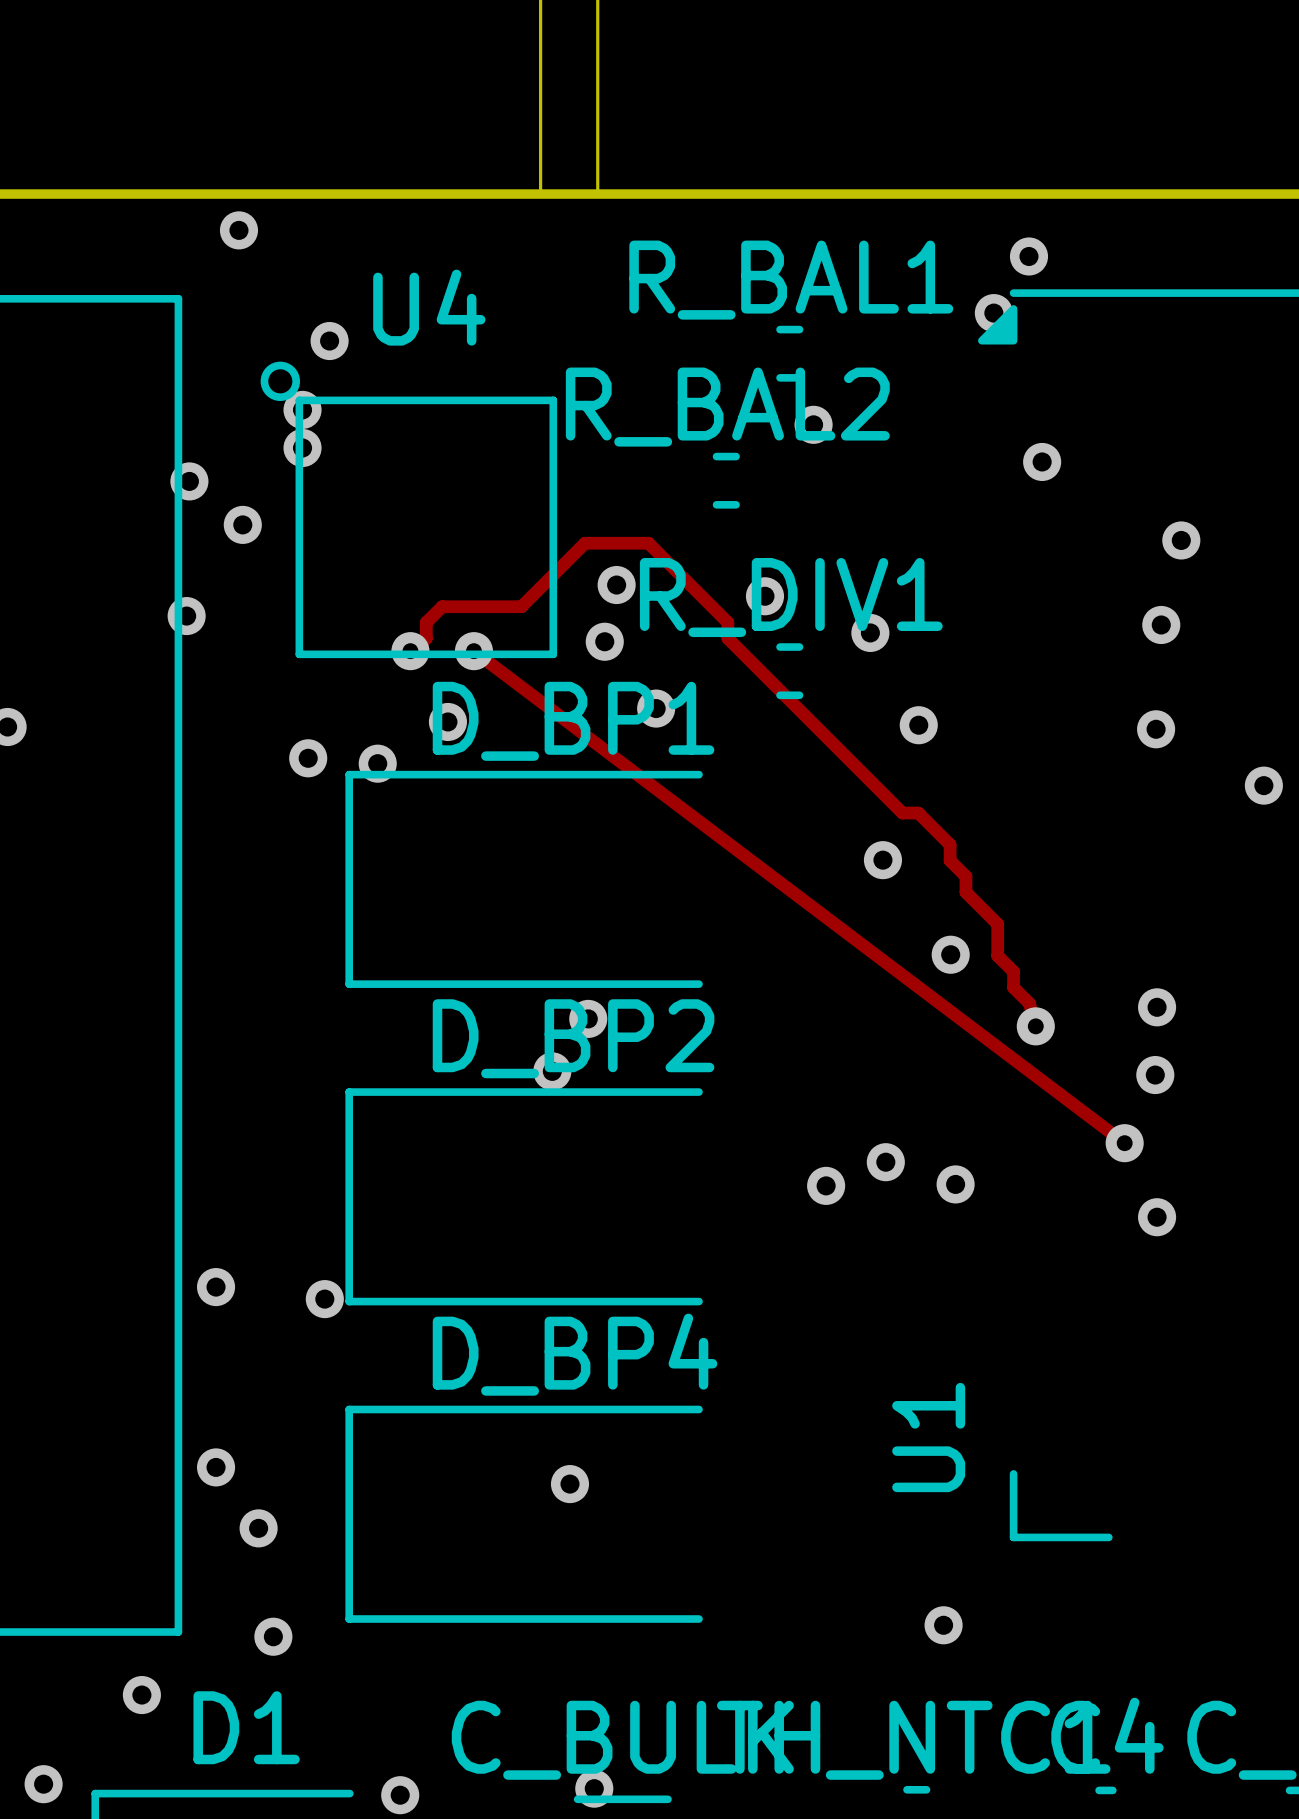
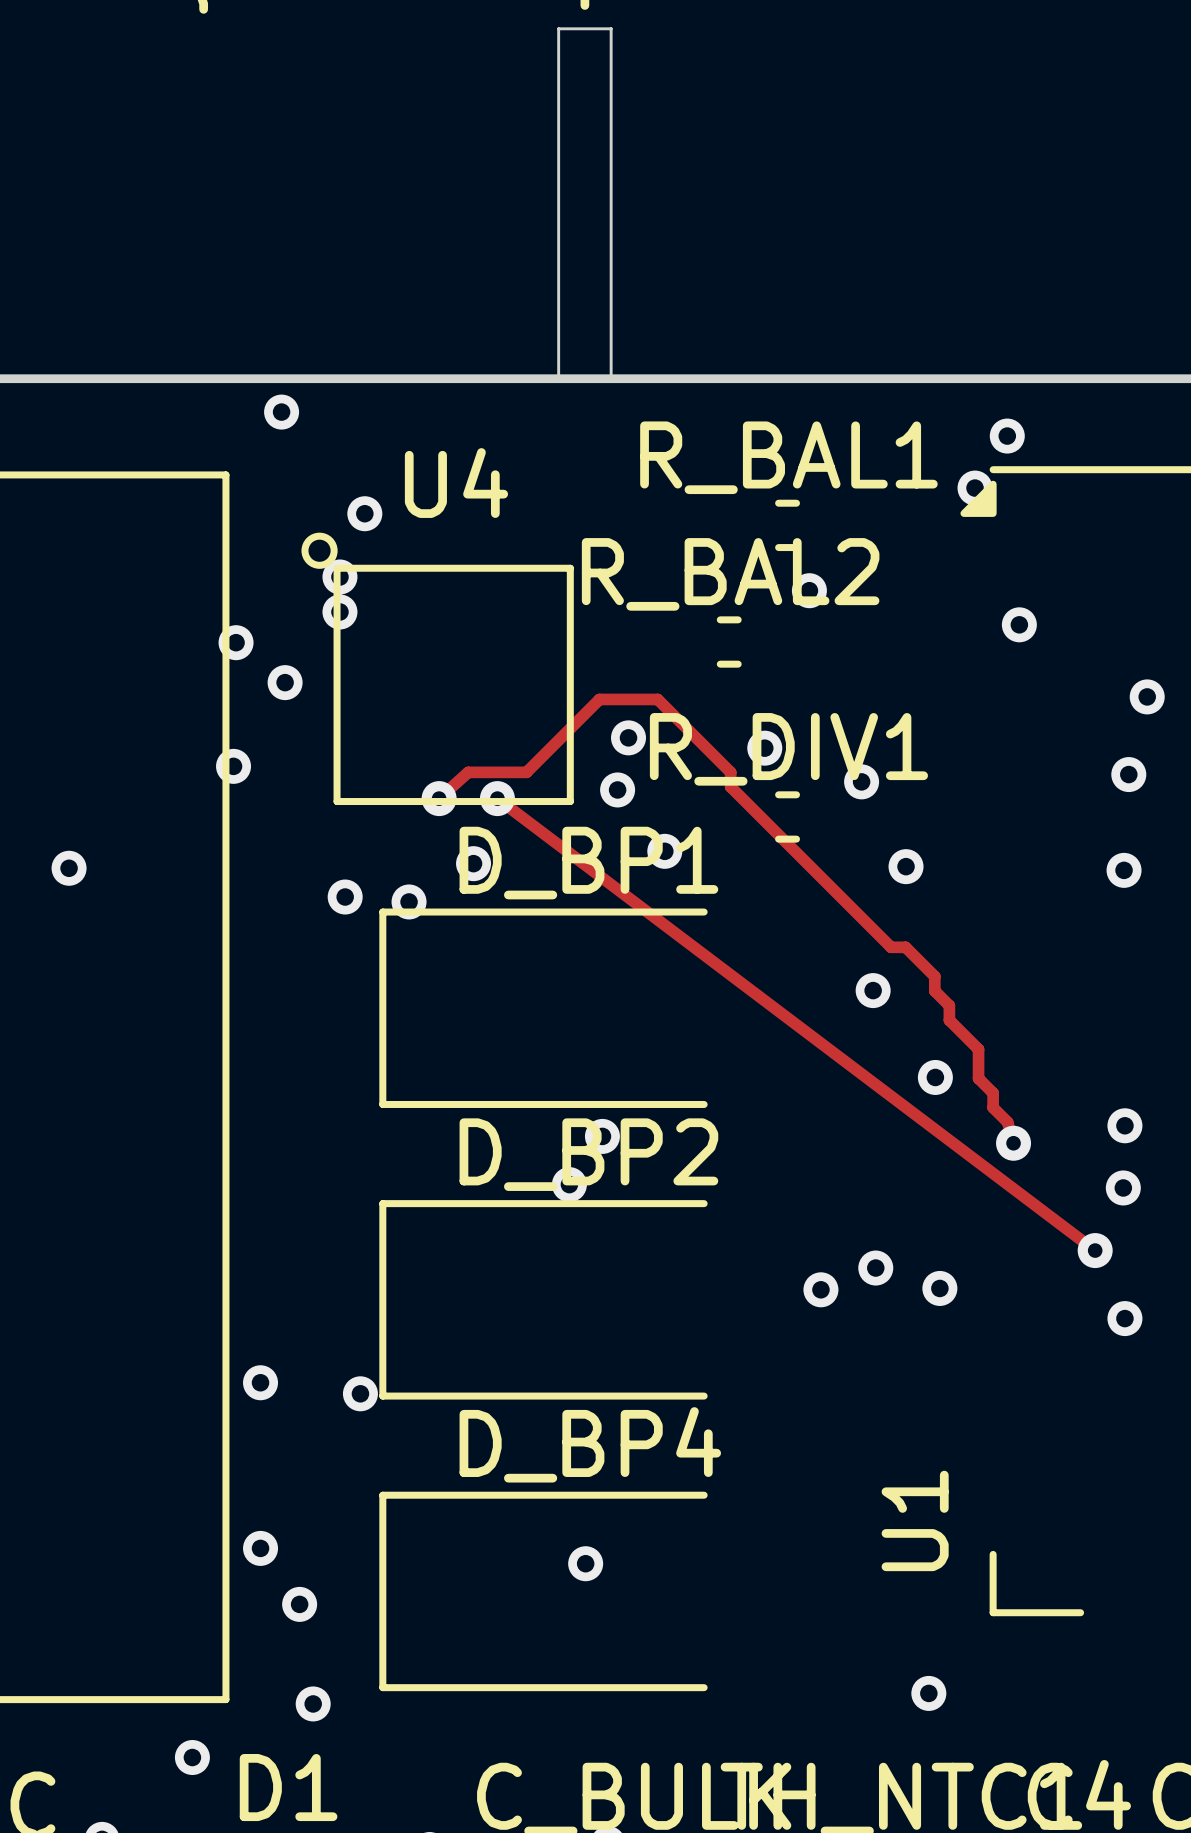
track: (521, 606) (442, 606) (426, 622) (426, 638) (410, 651) -> (541, 757) (526, 772) (468, 772) (439, 798)

